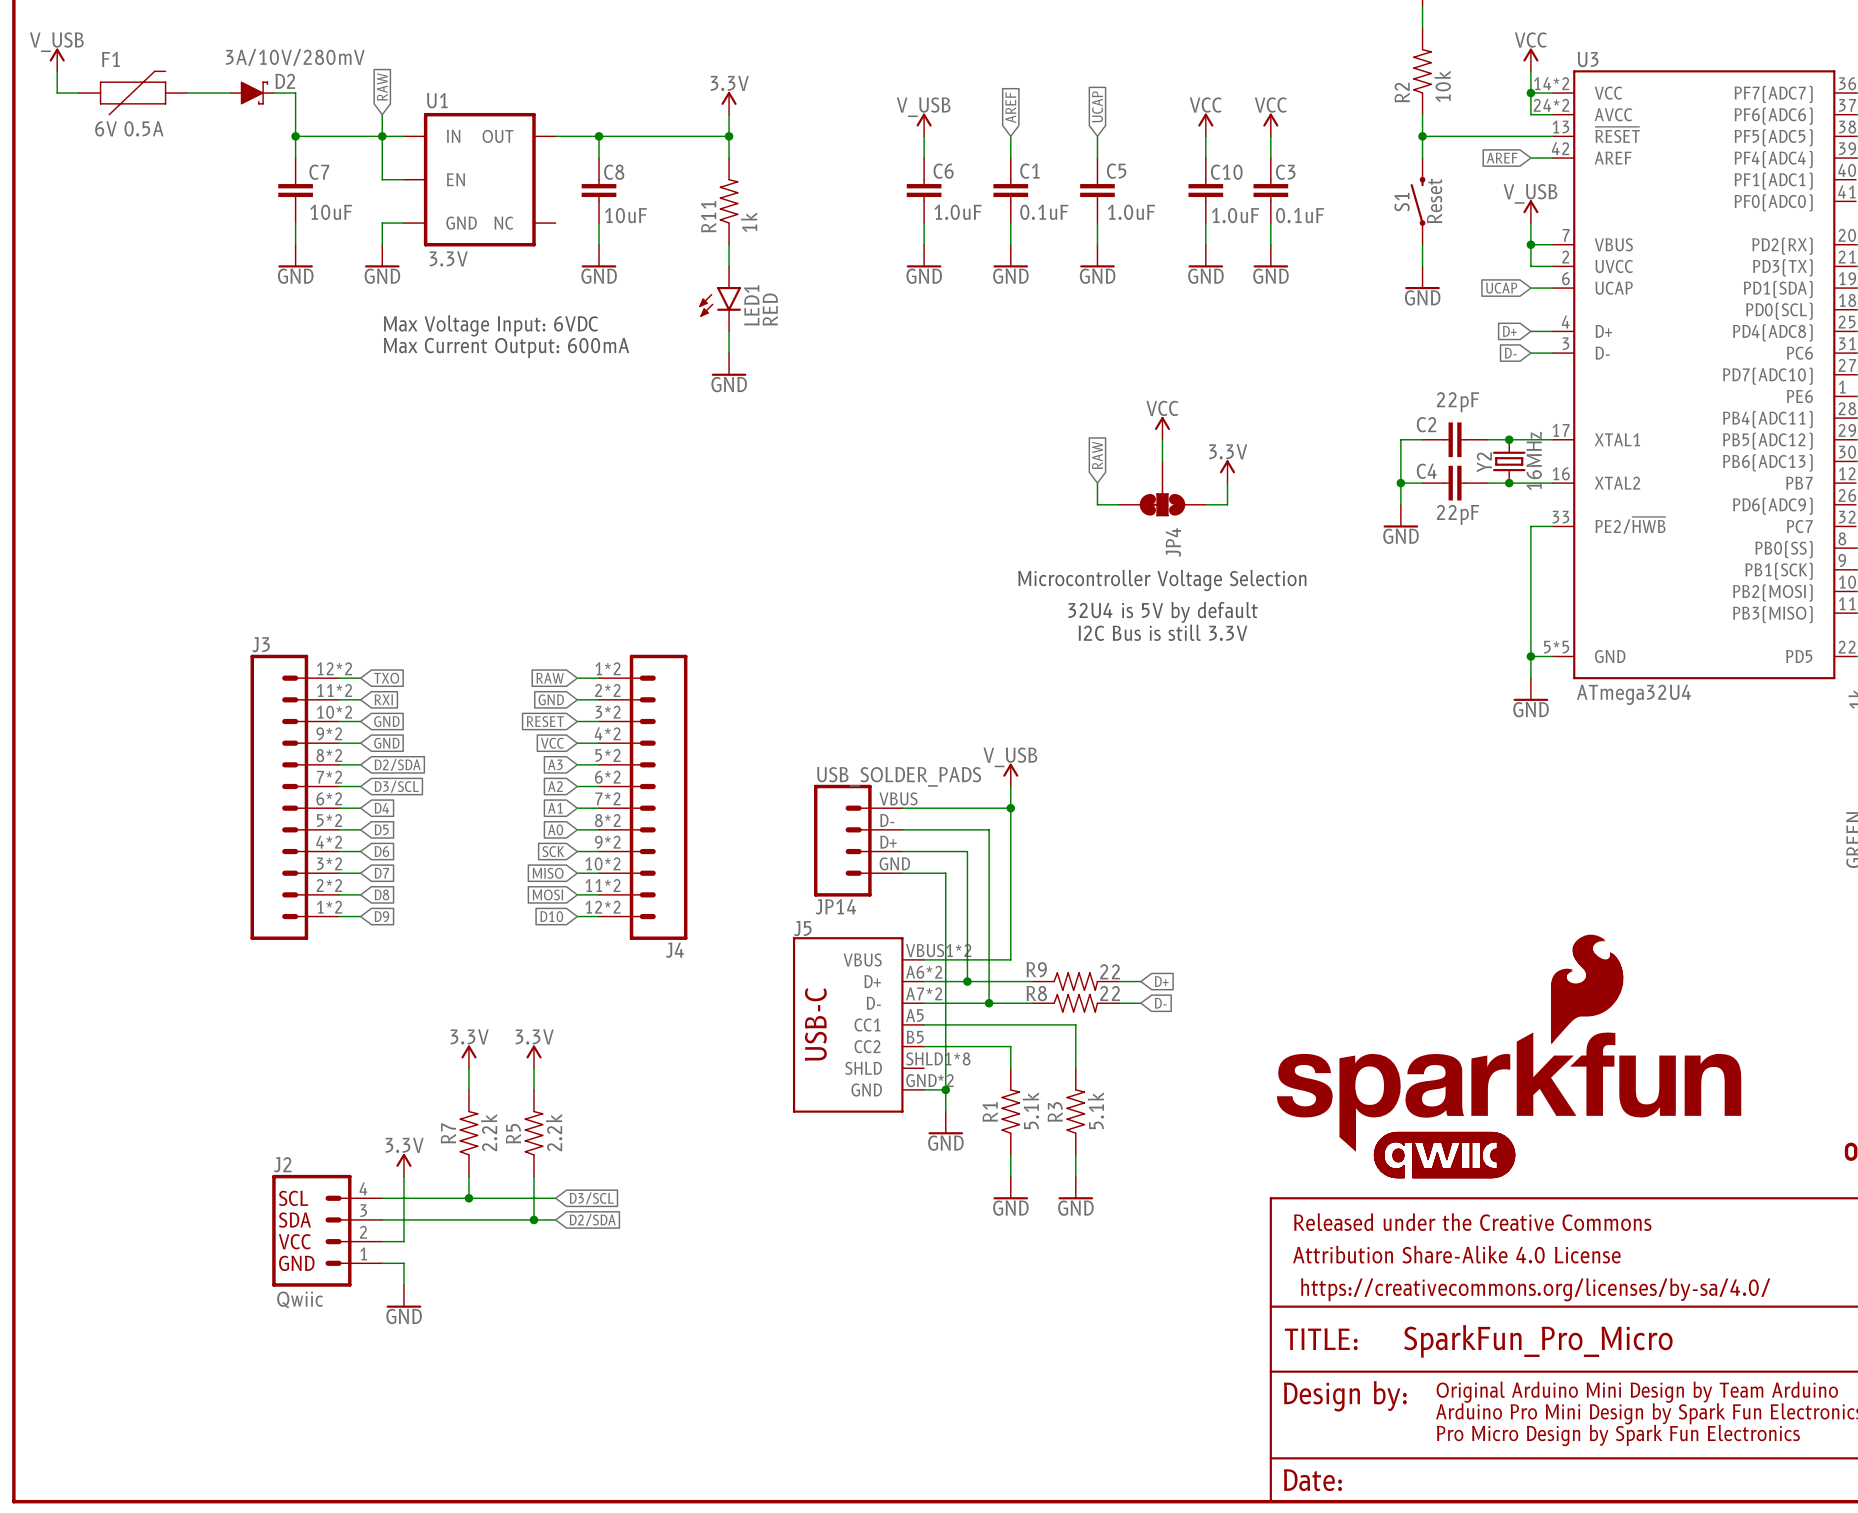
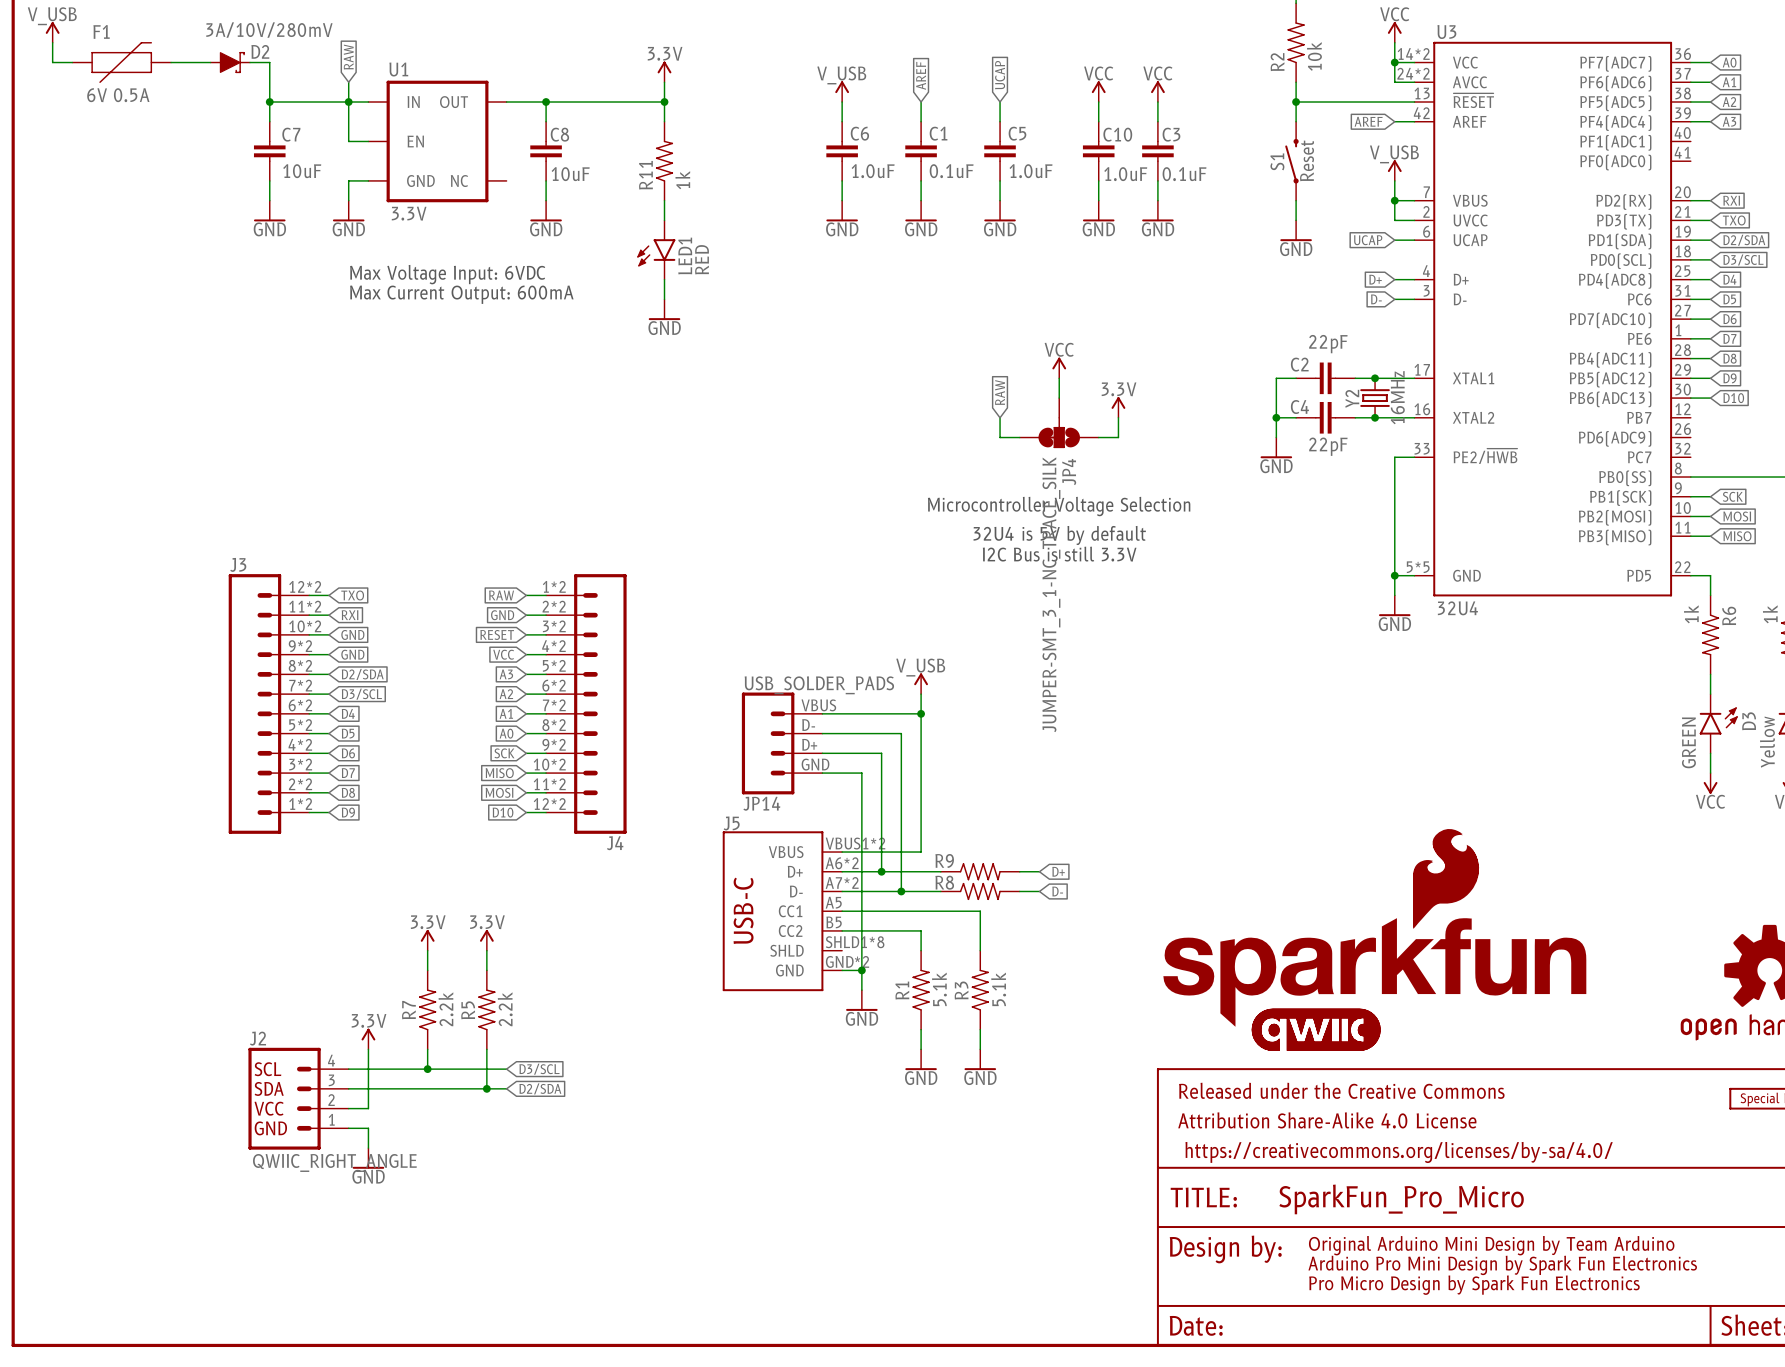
JP4 value: none -> JUMPER-SMT_3_1-NC_TRACE_SILK (1051, 594)
U3 value: ATmega32U4 (1633, 694) -> 32U4 (1457, 608)
R9 value: 22 (1110, 971) -> none
R8 value: 22 (1110, 993) -> none
J2 value: Qwiic (300, 1299) -> QWIIC_RIGHT_ANGLE (334, 1162)

